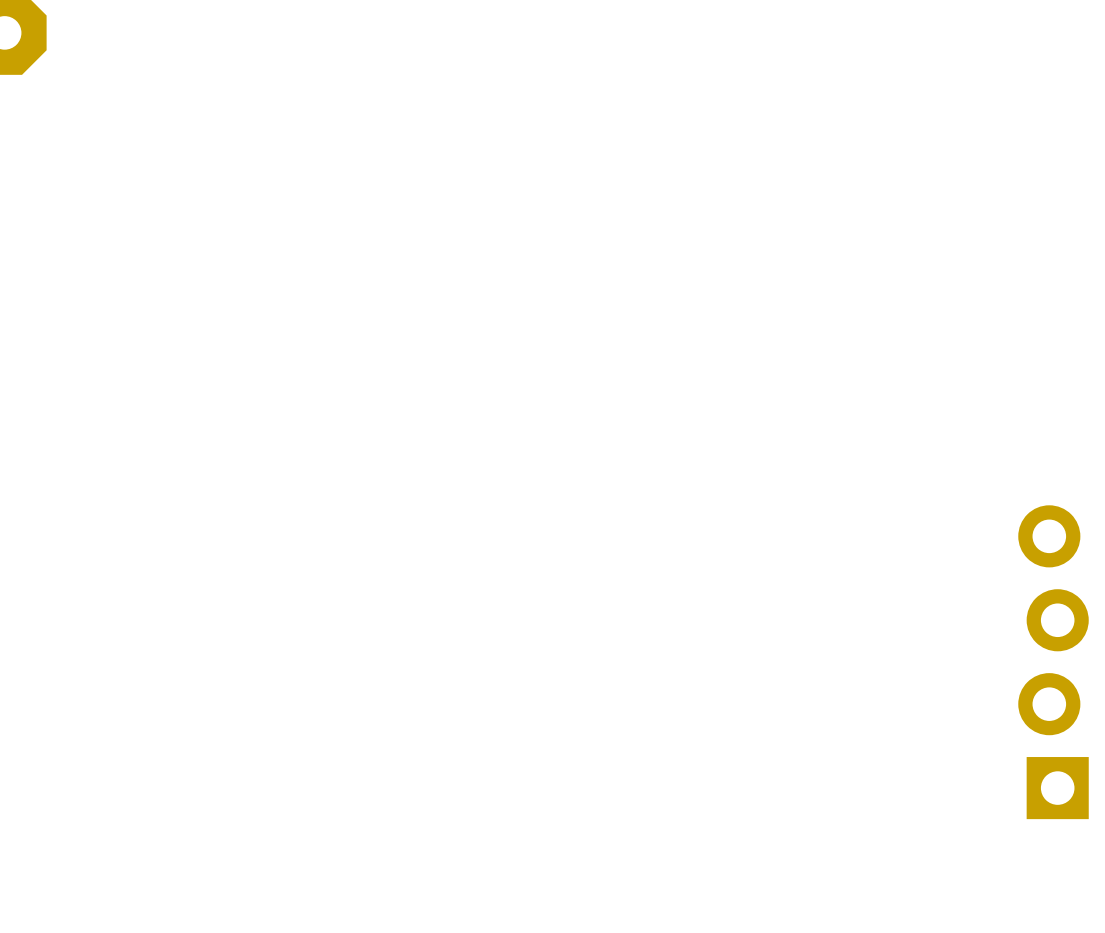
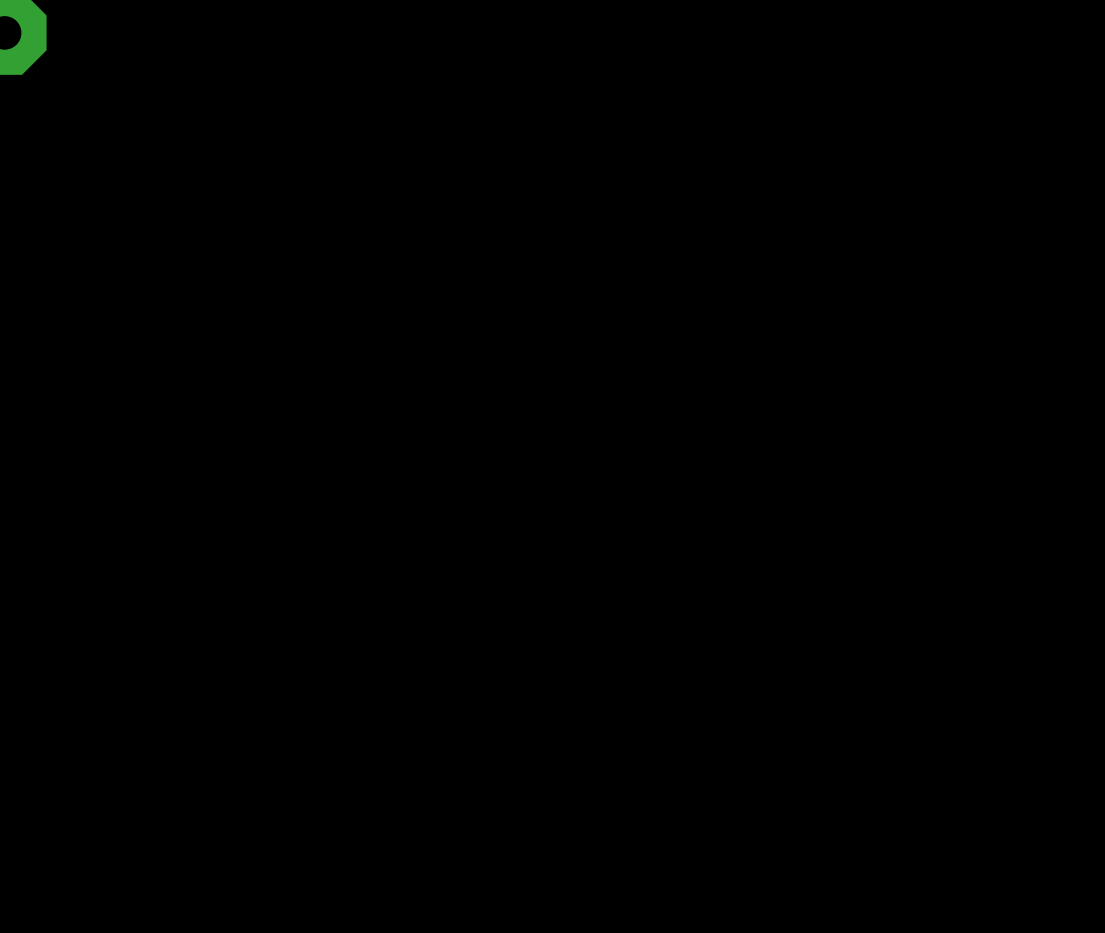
part: (1053, 662) -> none

